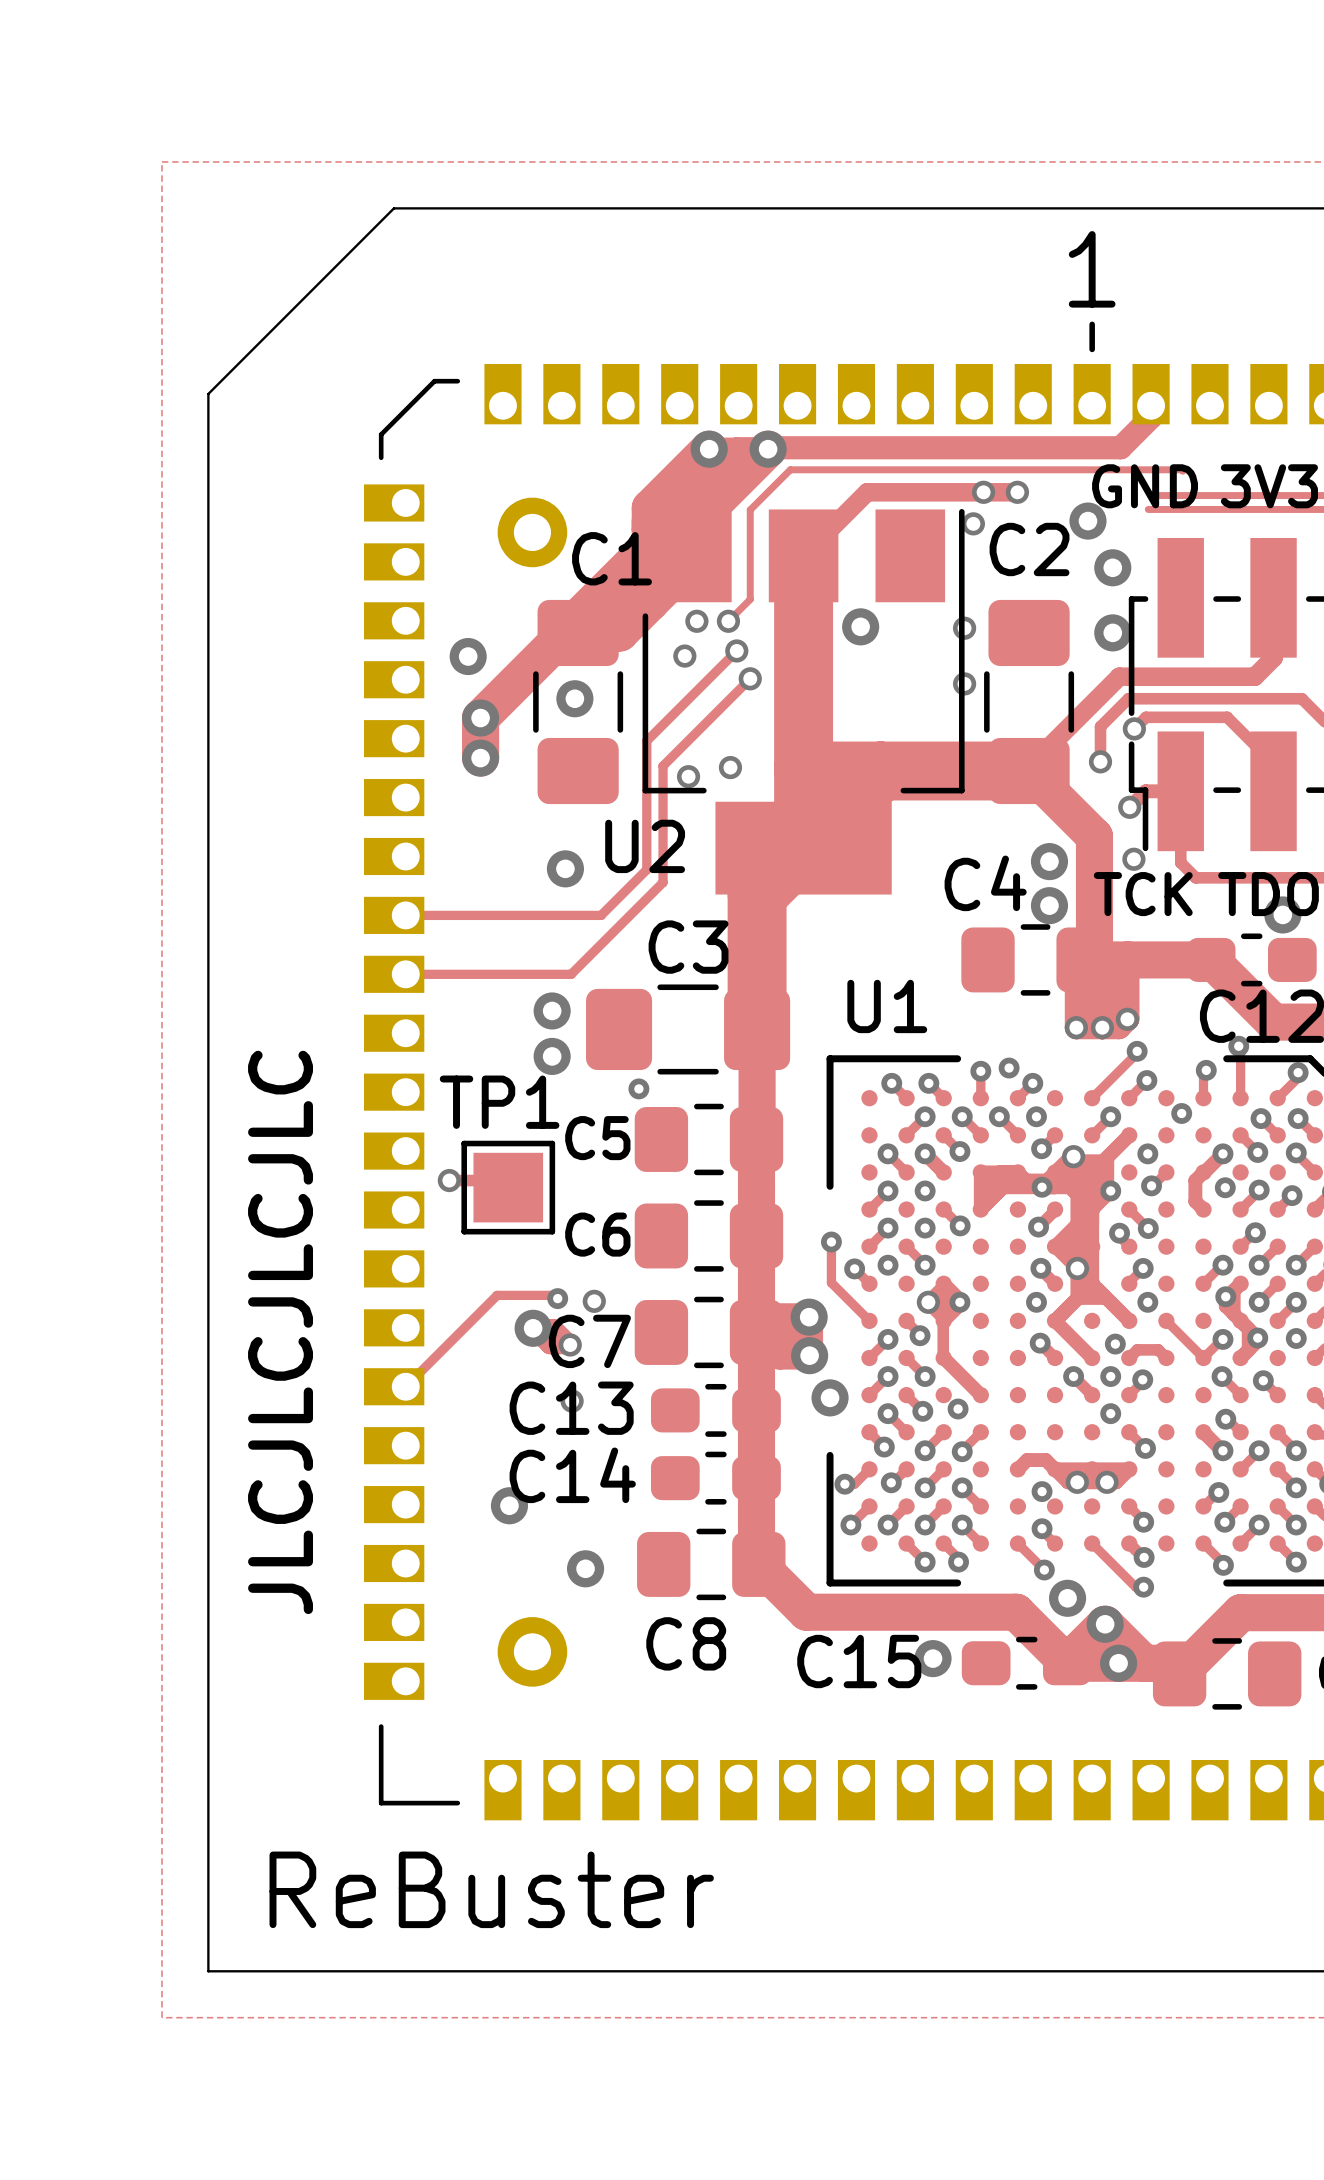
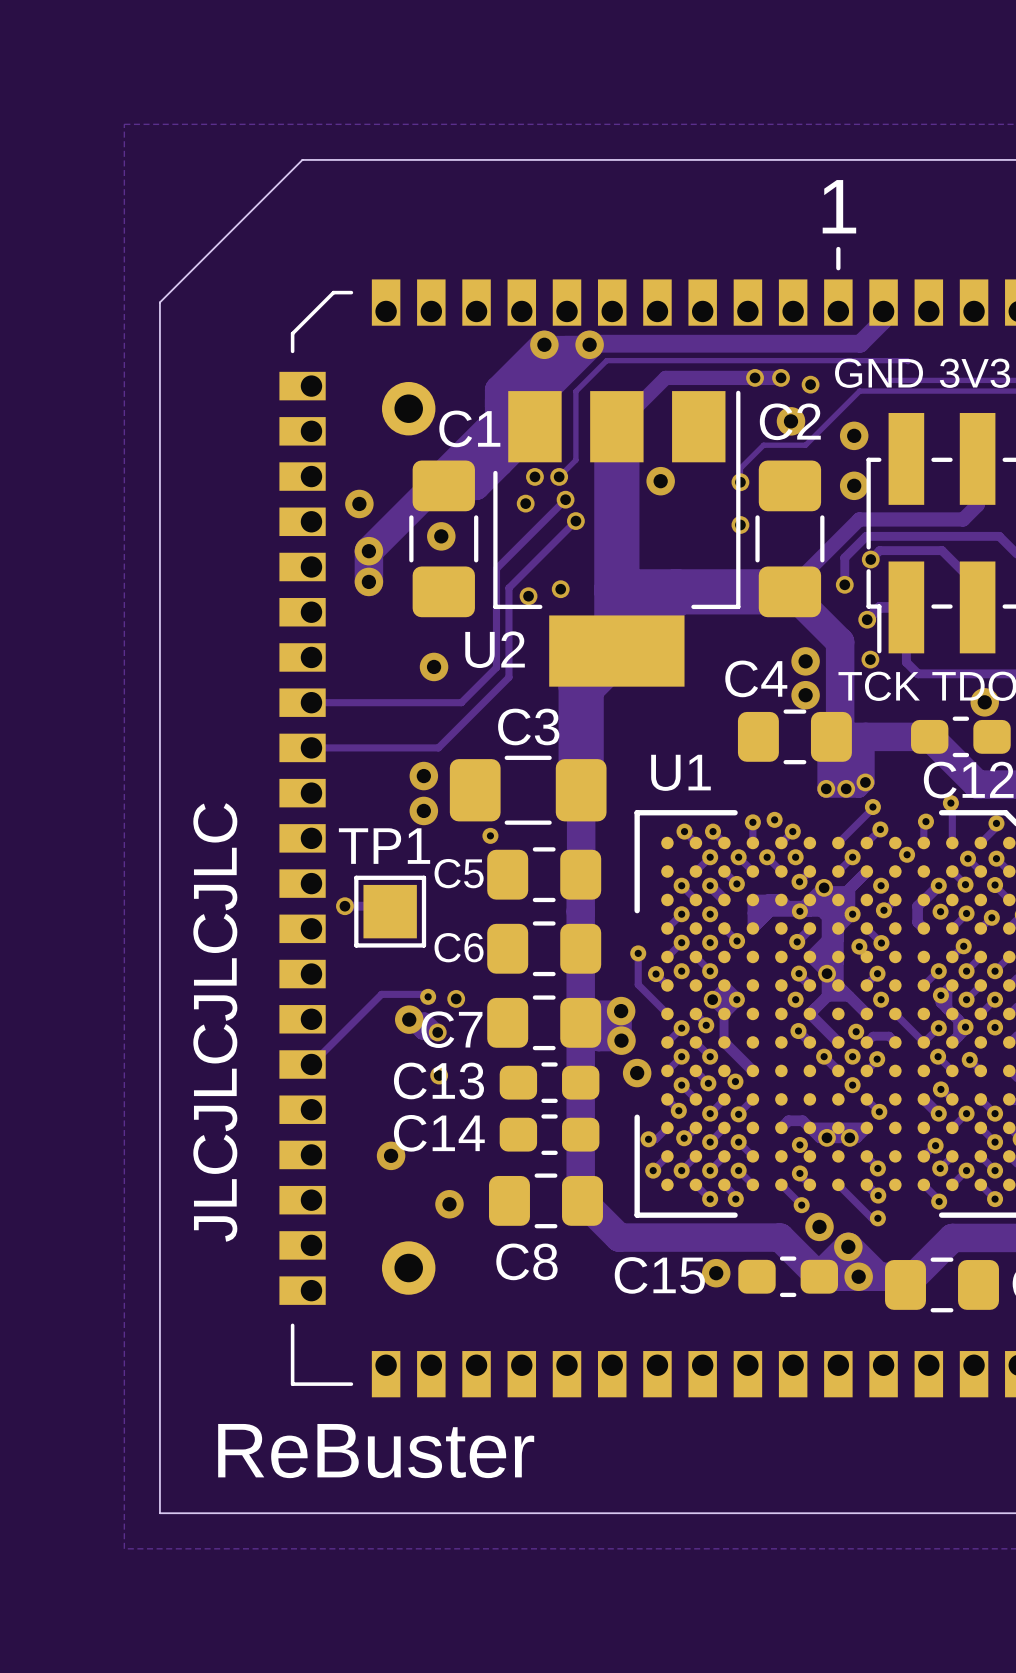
track: none -> (881, 391) (859, 391) (805, 445) (763, 445) (740, 468) (740, 482)
via position: (1087, 521) -> (791, 421)
via position: (973, 523) -> (810, 384)

